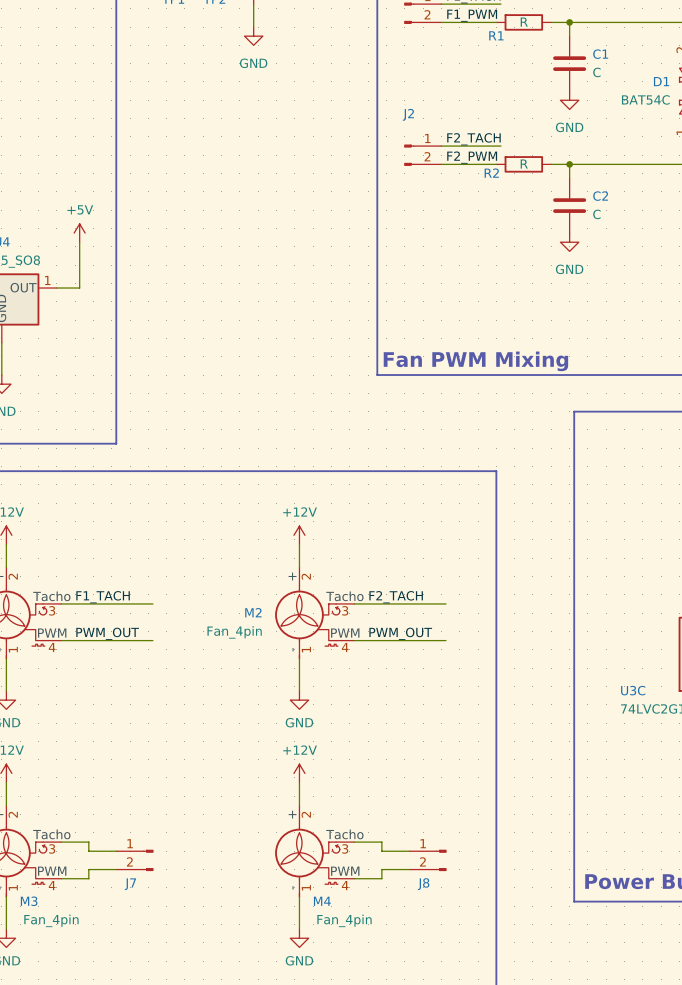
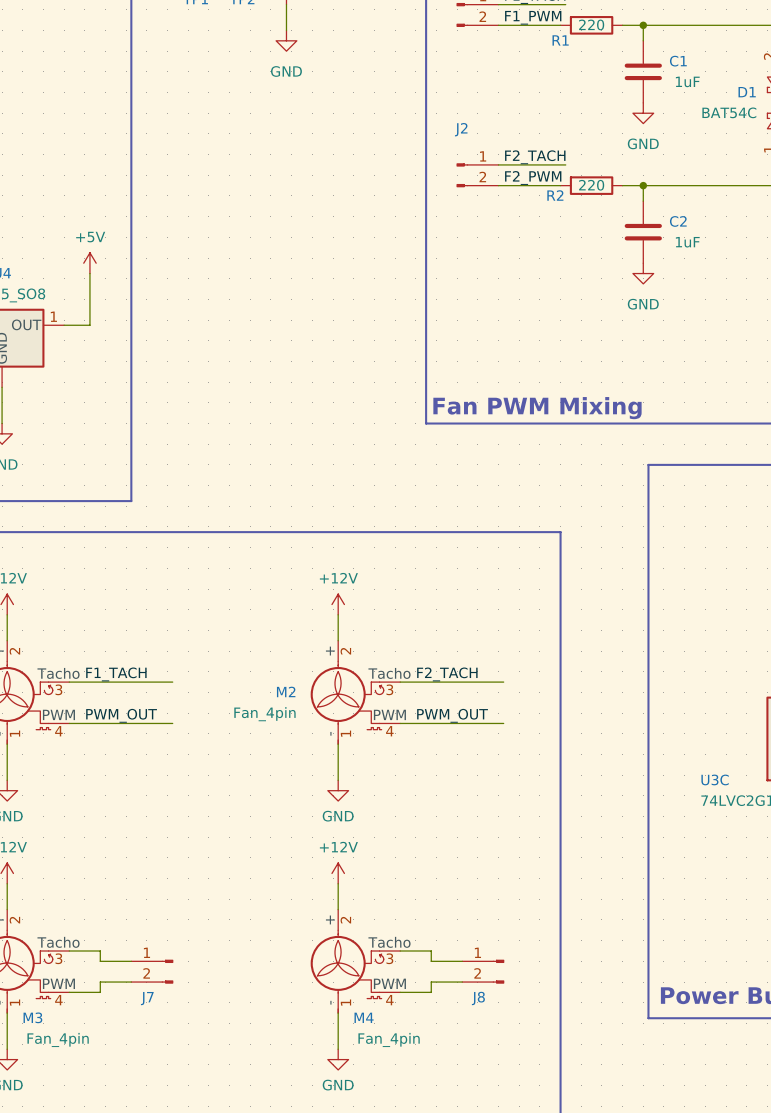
R1 value: R (524, 22) -> 220 (591, 24)
C1 value: C (596, 72) -> 1uF (687, 81)
R2 value: R (524, 164) -> 220 (591, 185)
C2 value: C (596, 214) -> 1uF (687, 242)

